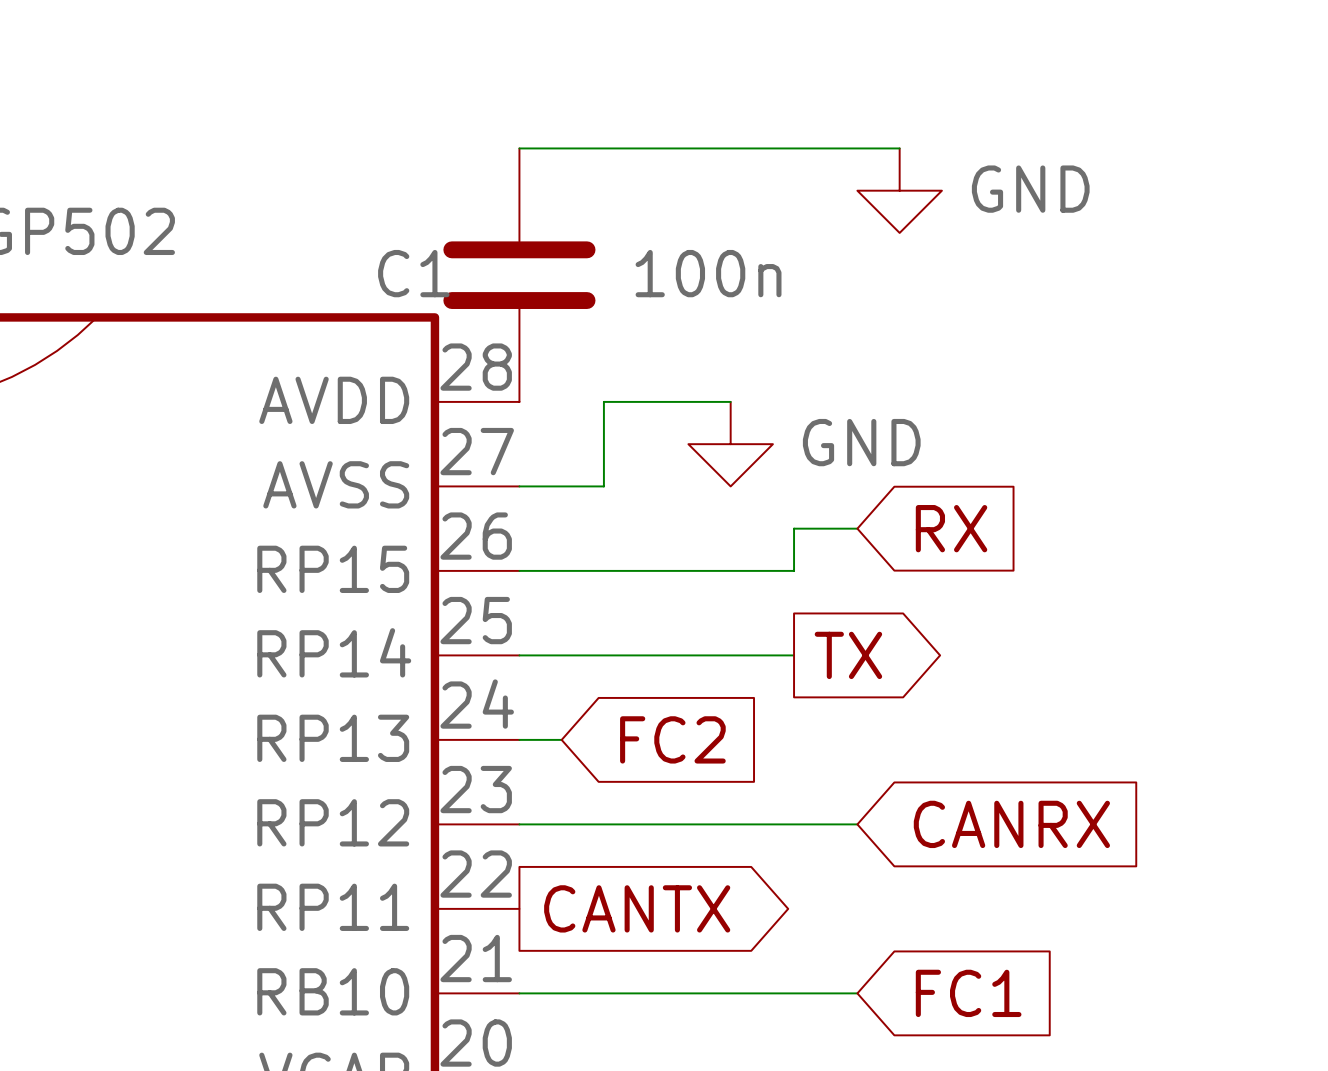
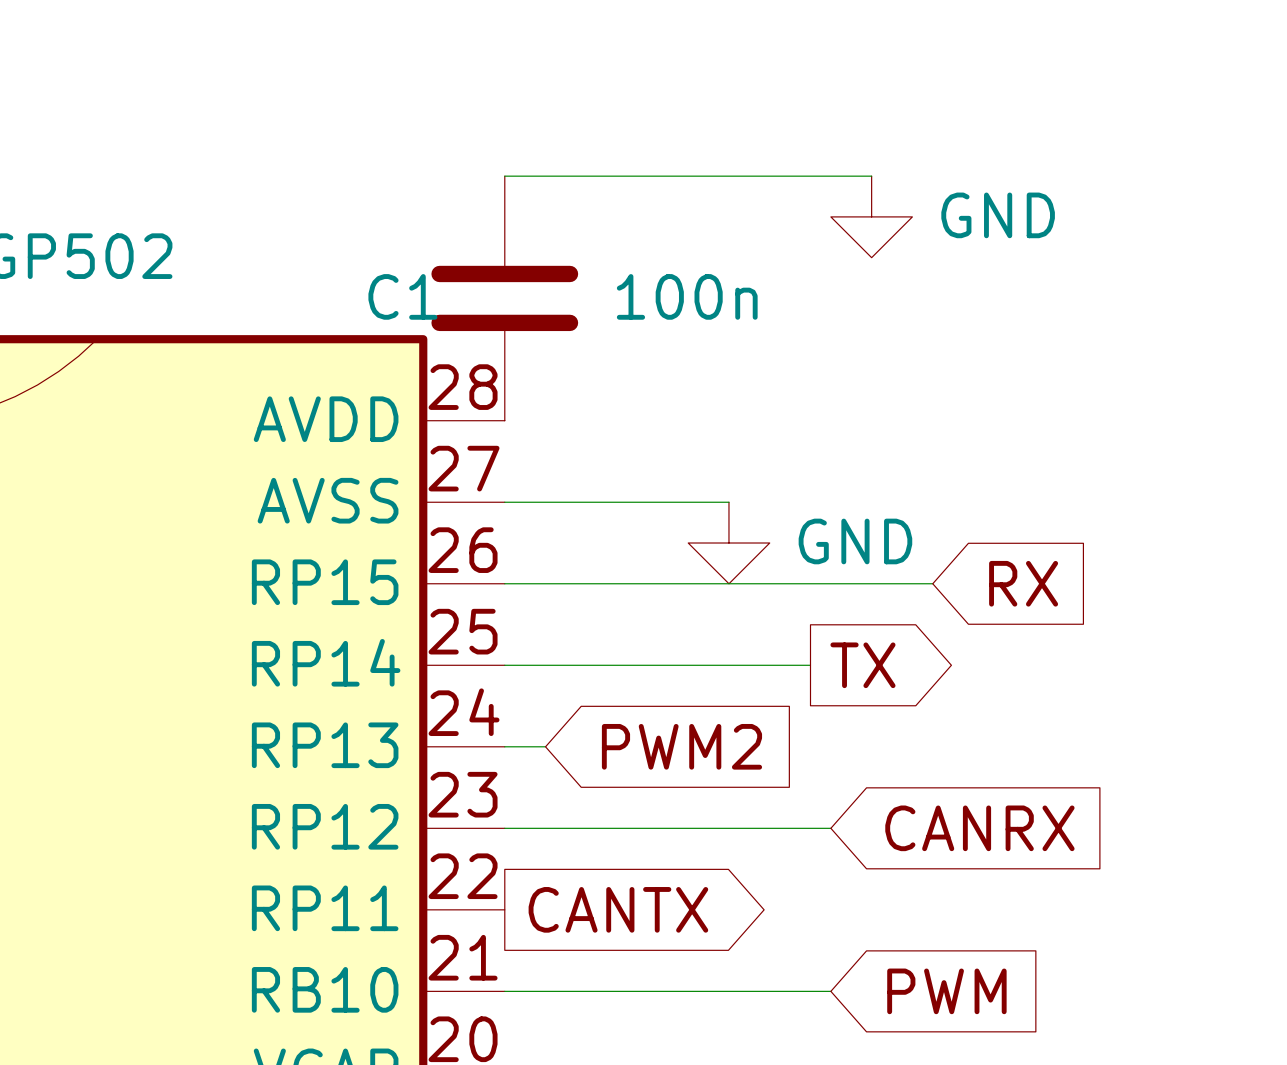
wire: (730, 401) (603, 401) (603, 486) -> (728, 502) (586, 502)
power symbol position: GND (730, 444) -> GND (728, 543)
wire: (857, 528) (794, 528) (794, 570) -> (932, 583) (769, 583)
global label position: RX (951, 528) -> RX (1023, 583)
wire: none -> (769, 665) (810, 665)
global label position: TX (848, 655) -> TX (862, 665)
global label: FC2 (672, 739) -> PWM2 (681, 746)
global label: FC1 (968, 993) -> PWM (946, 991)

